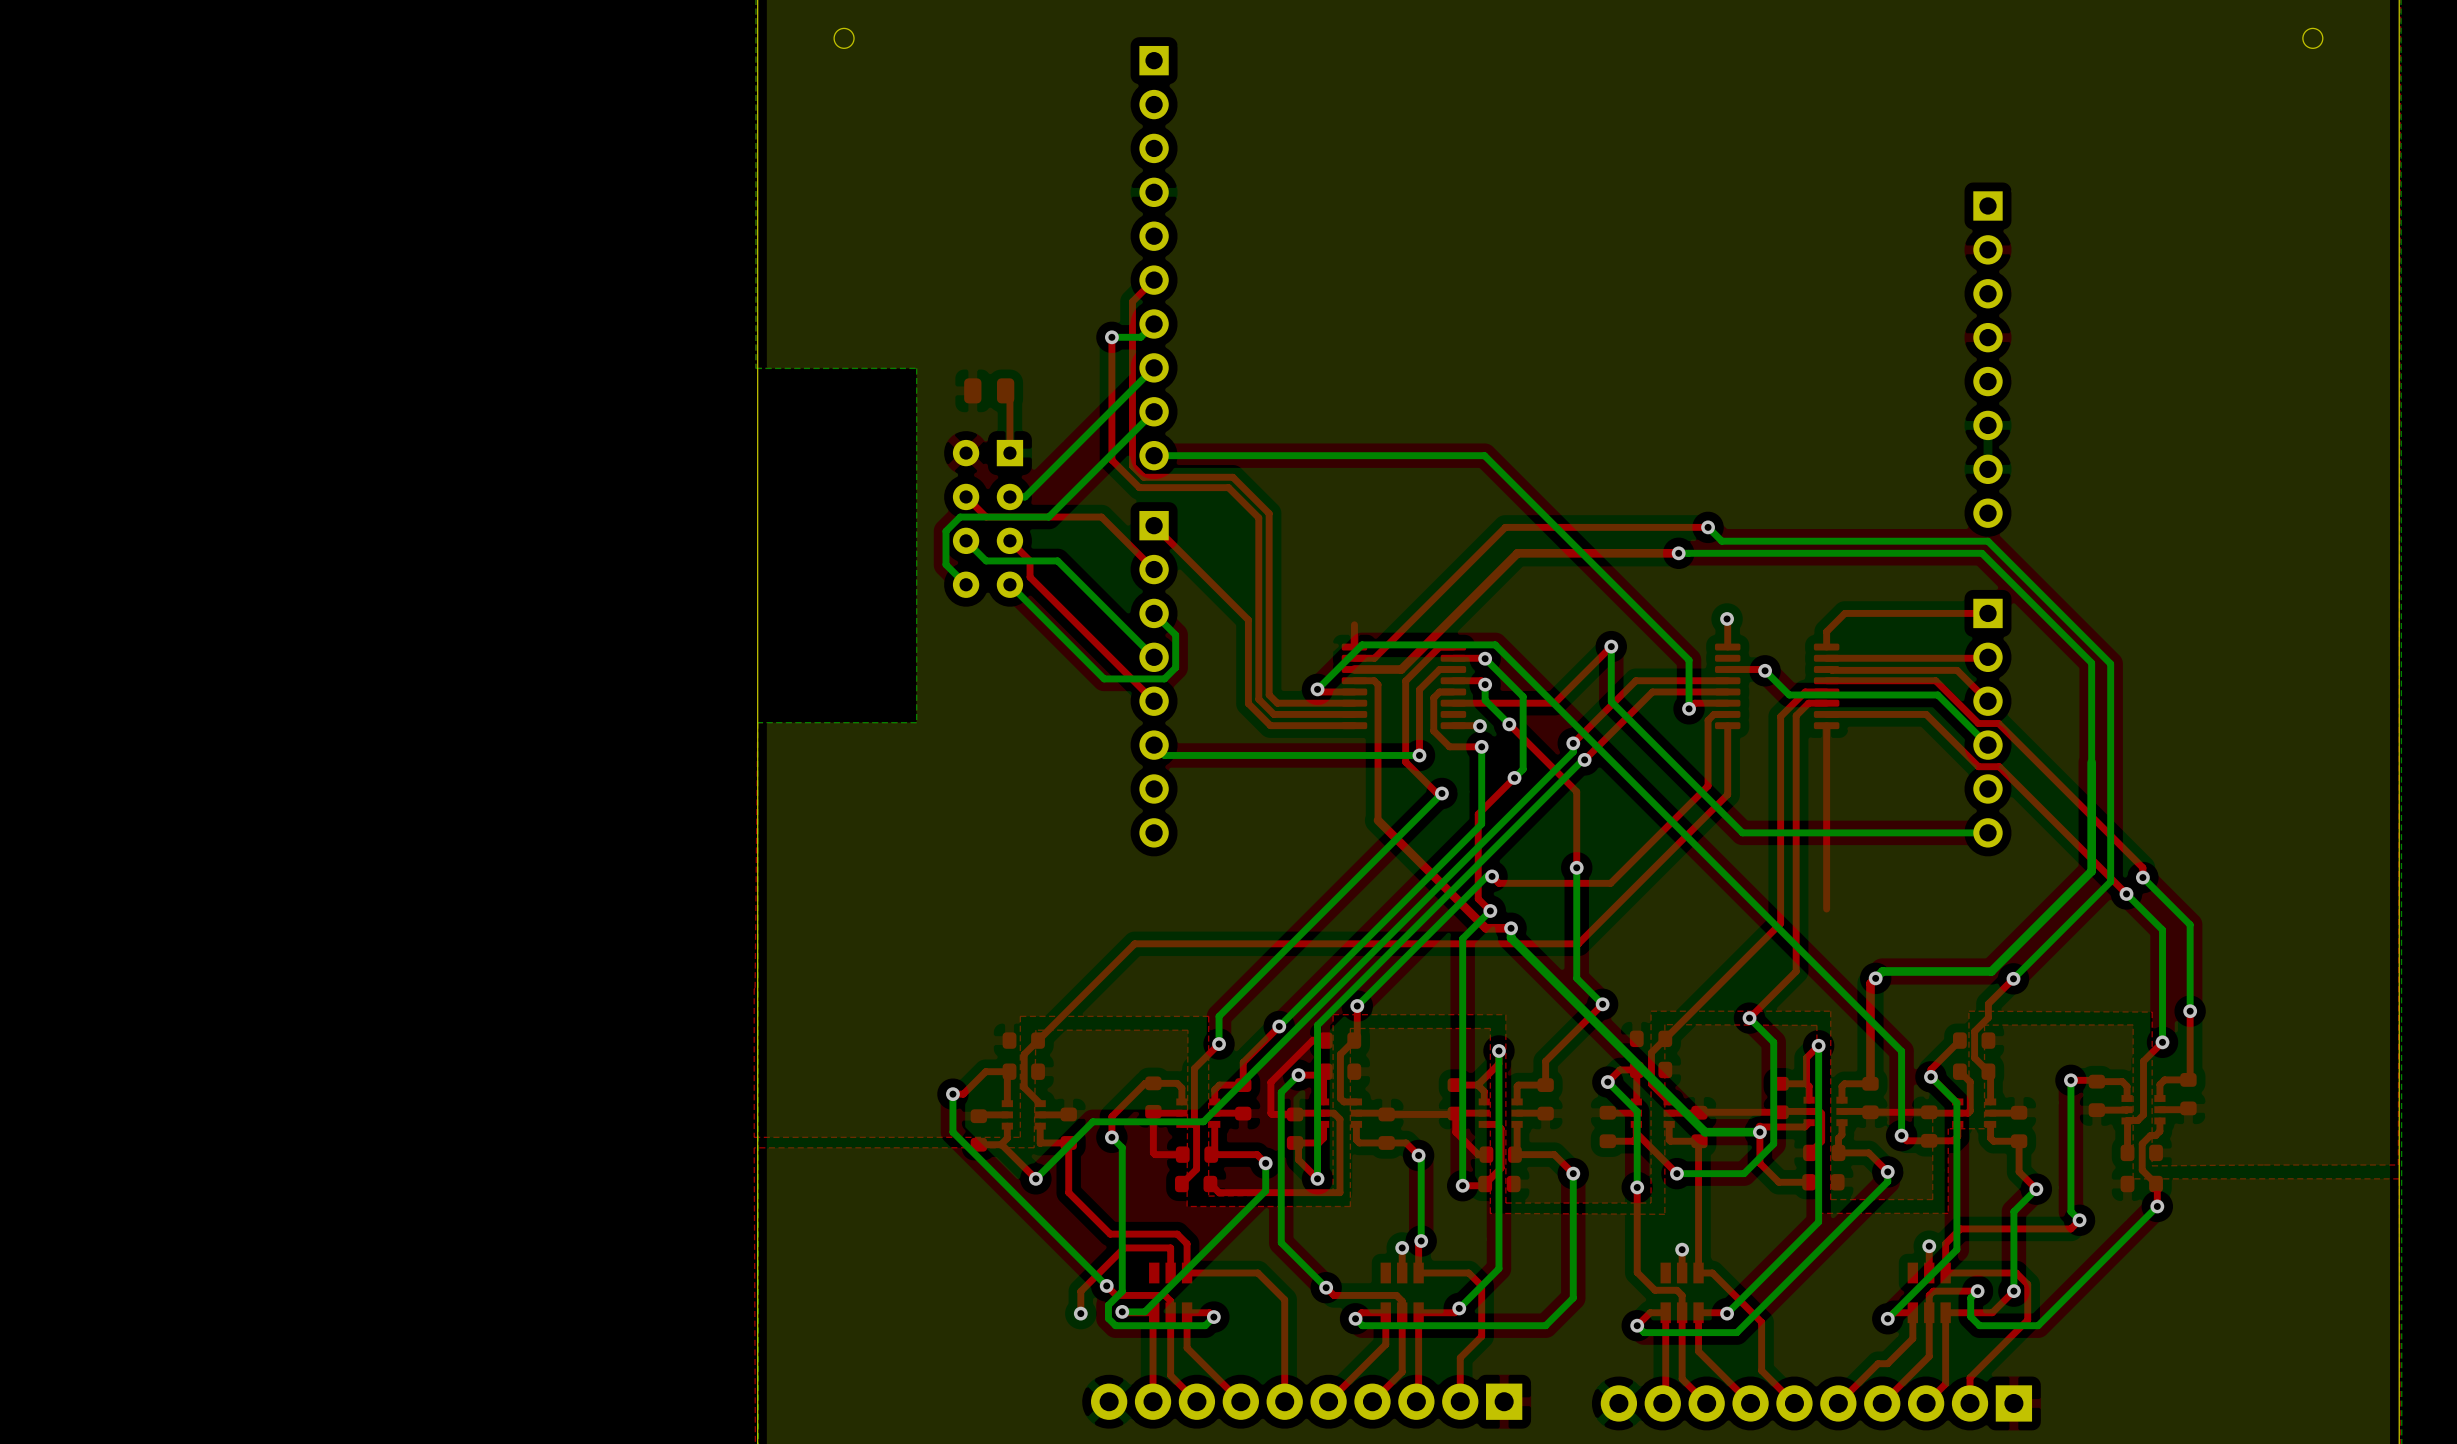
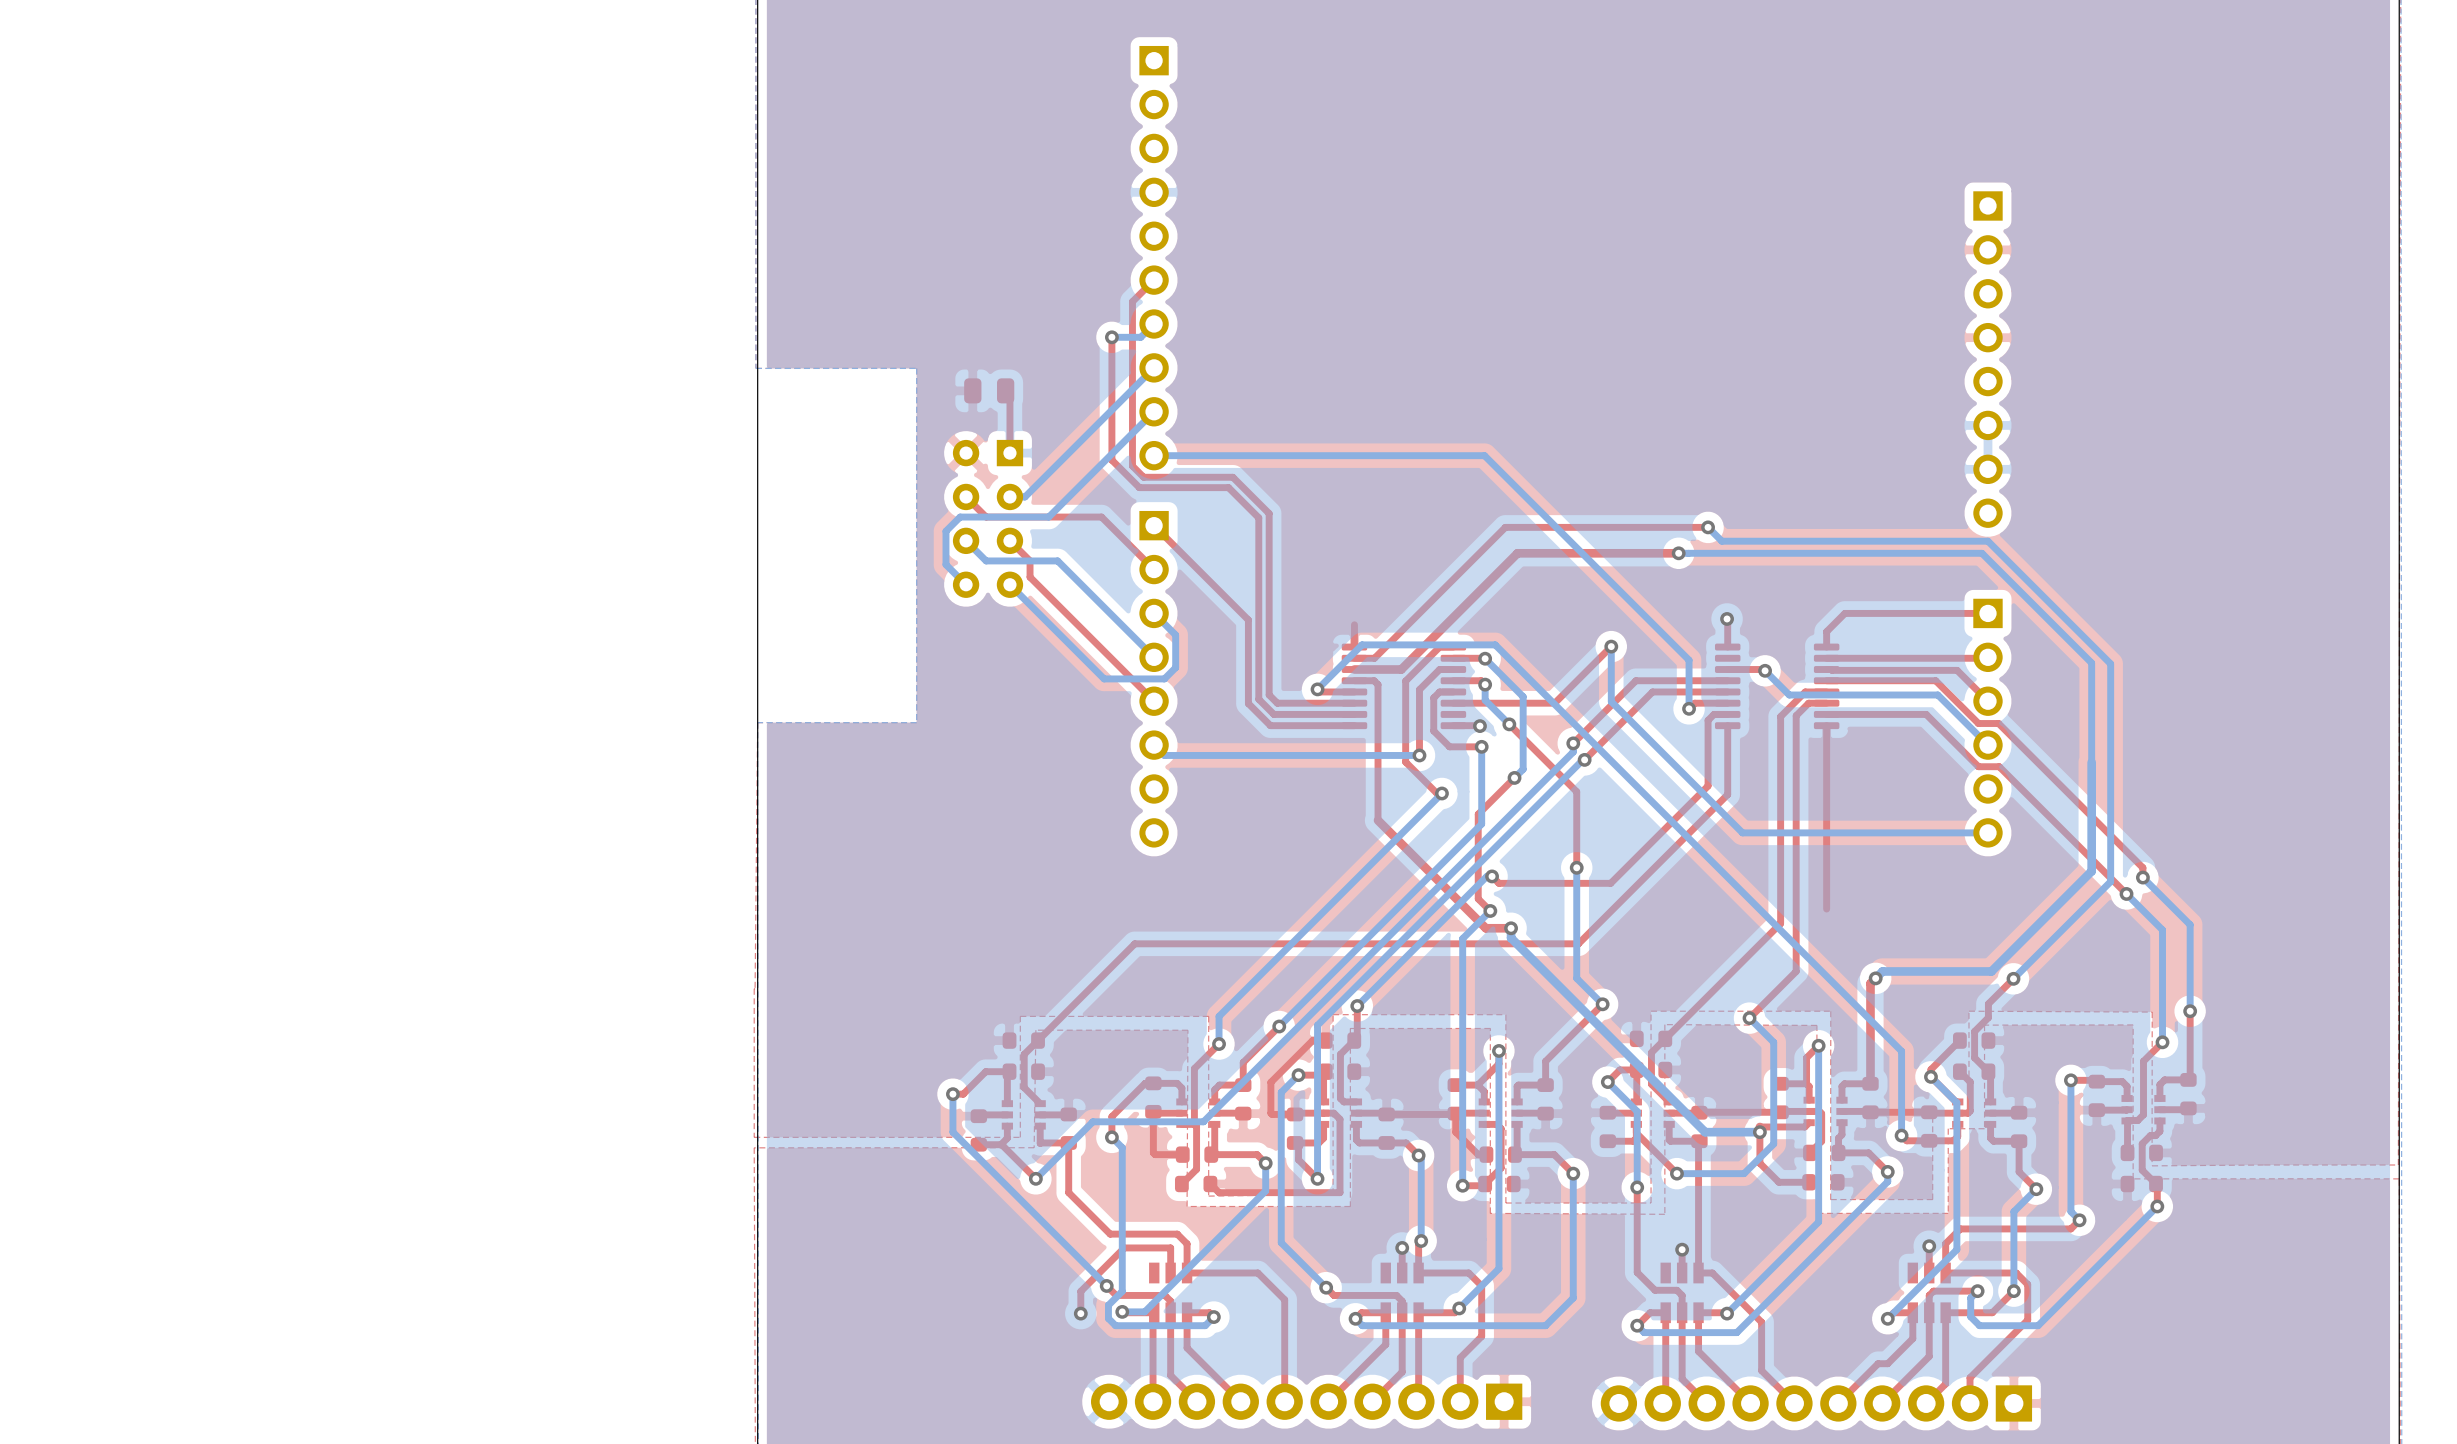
round board edge: [833, 27, 855, 49] -> none
round board edge: [2302, 27, 2324, 49] -> none

